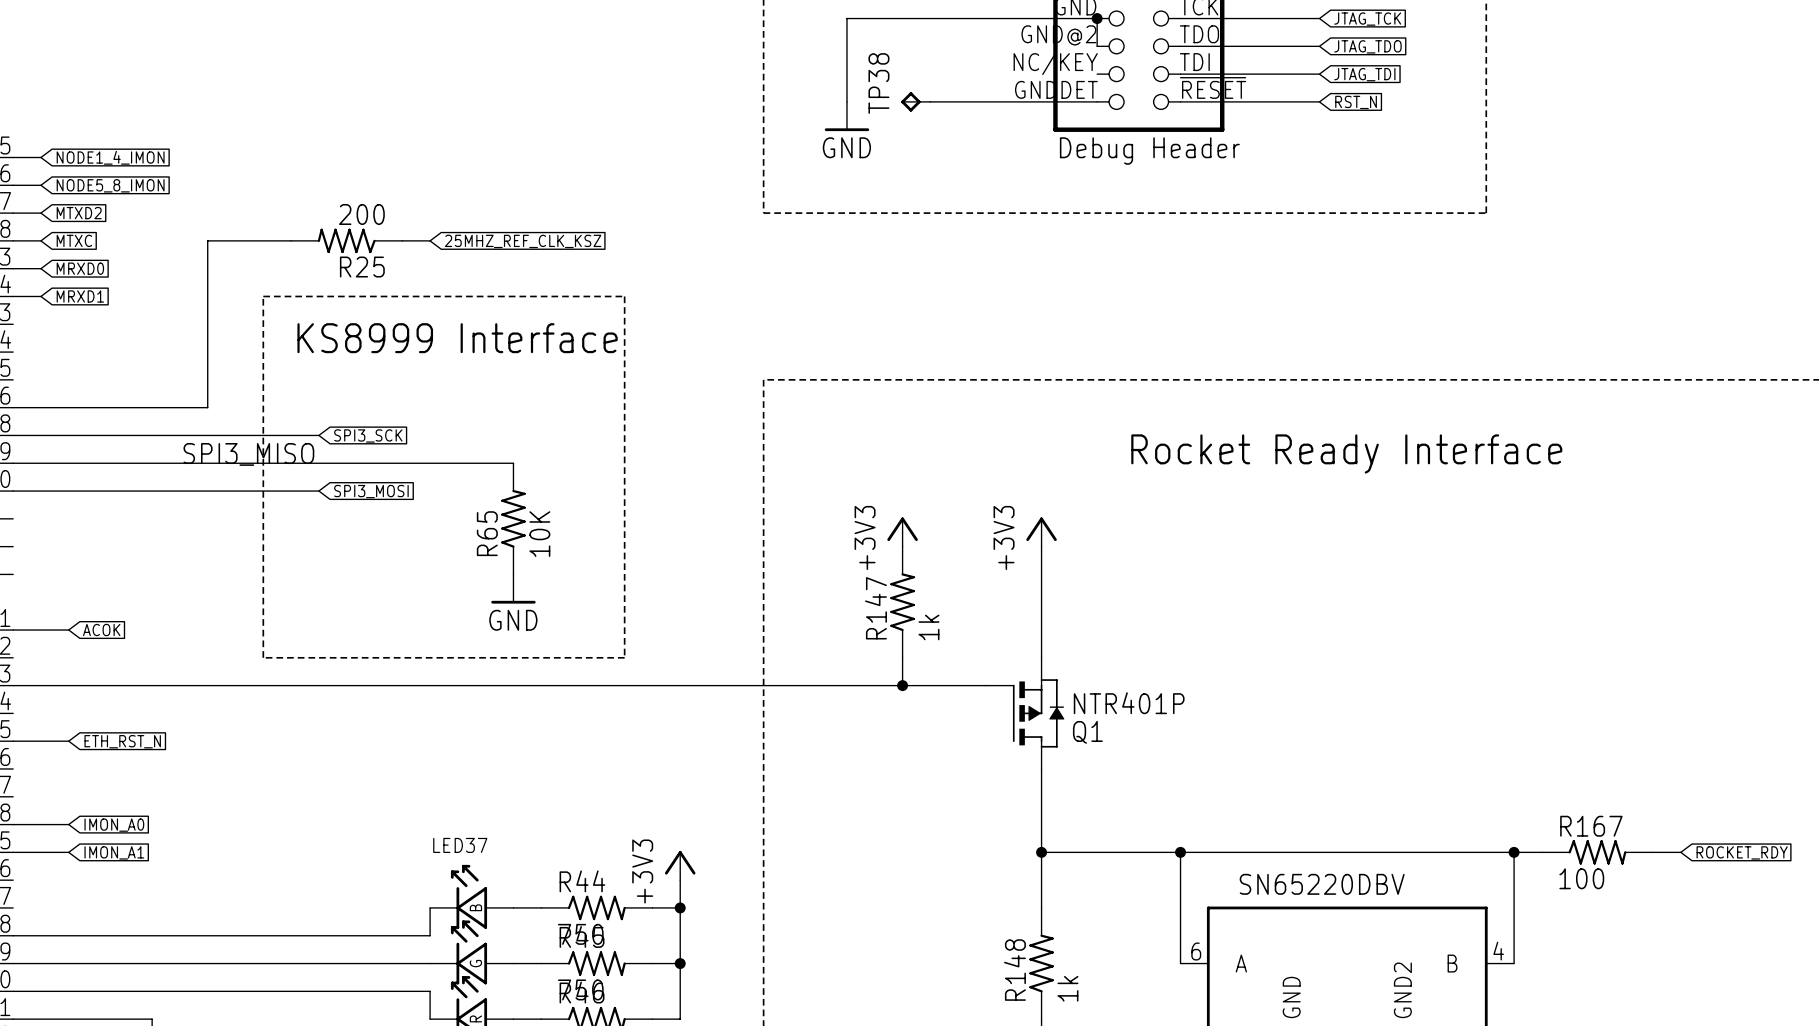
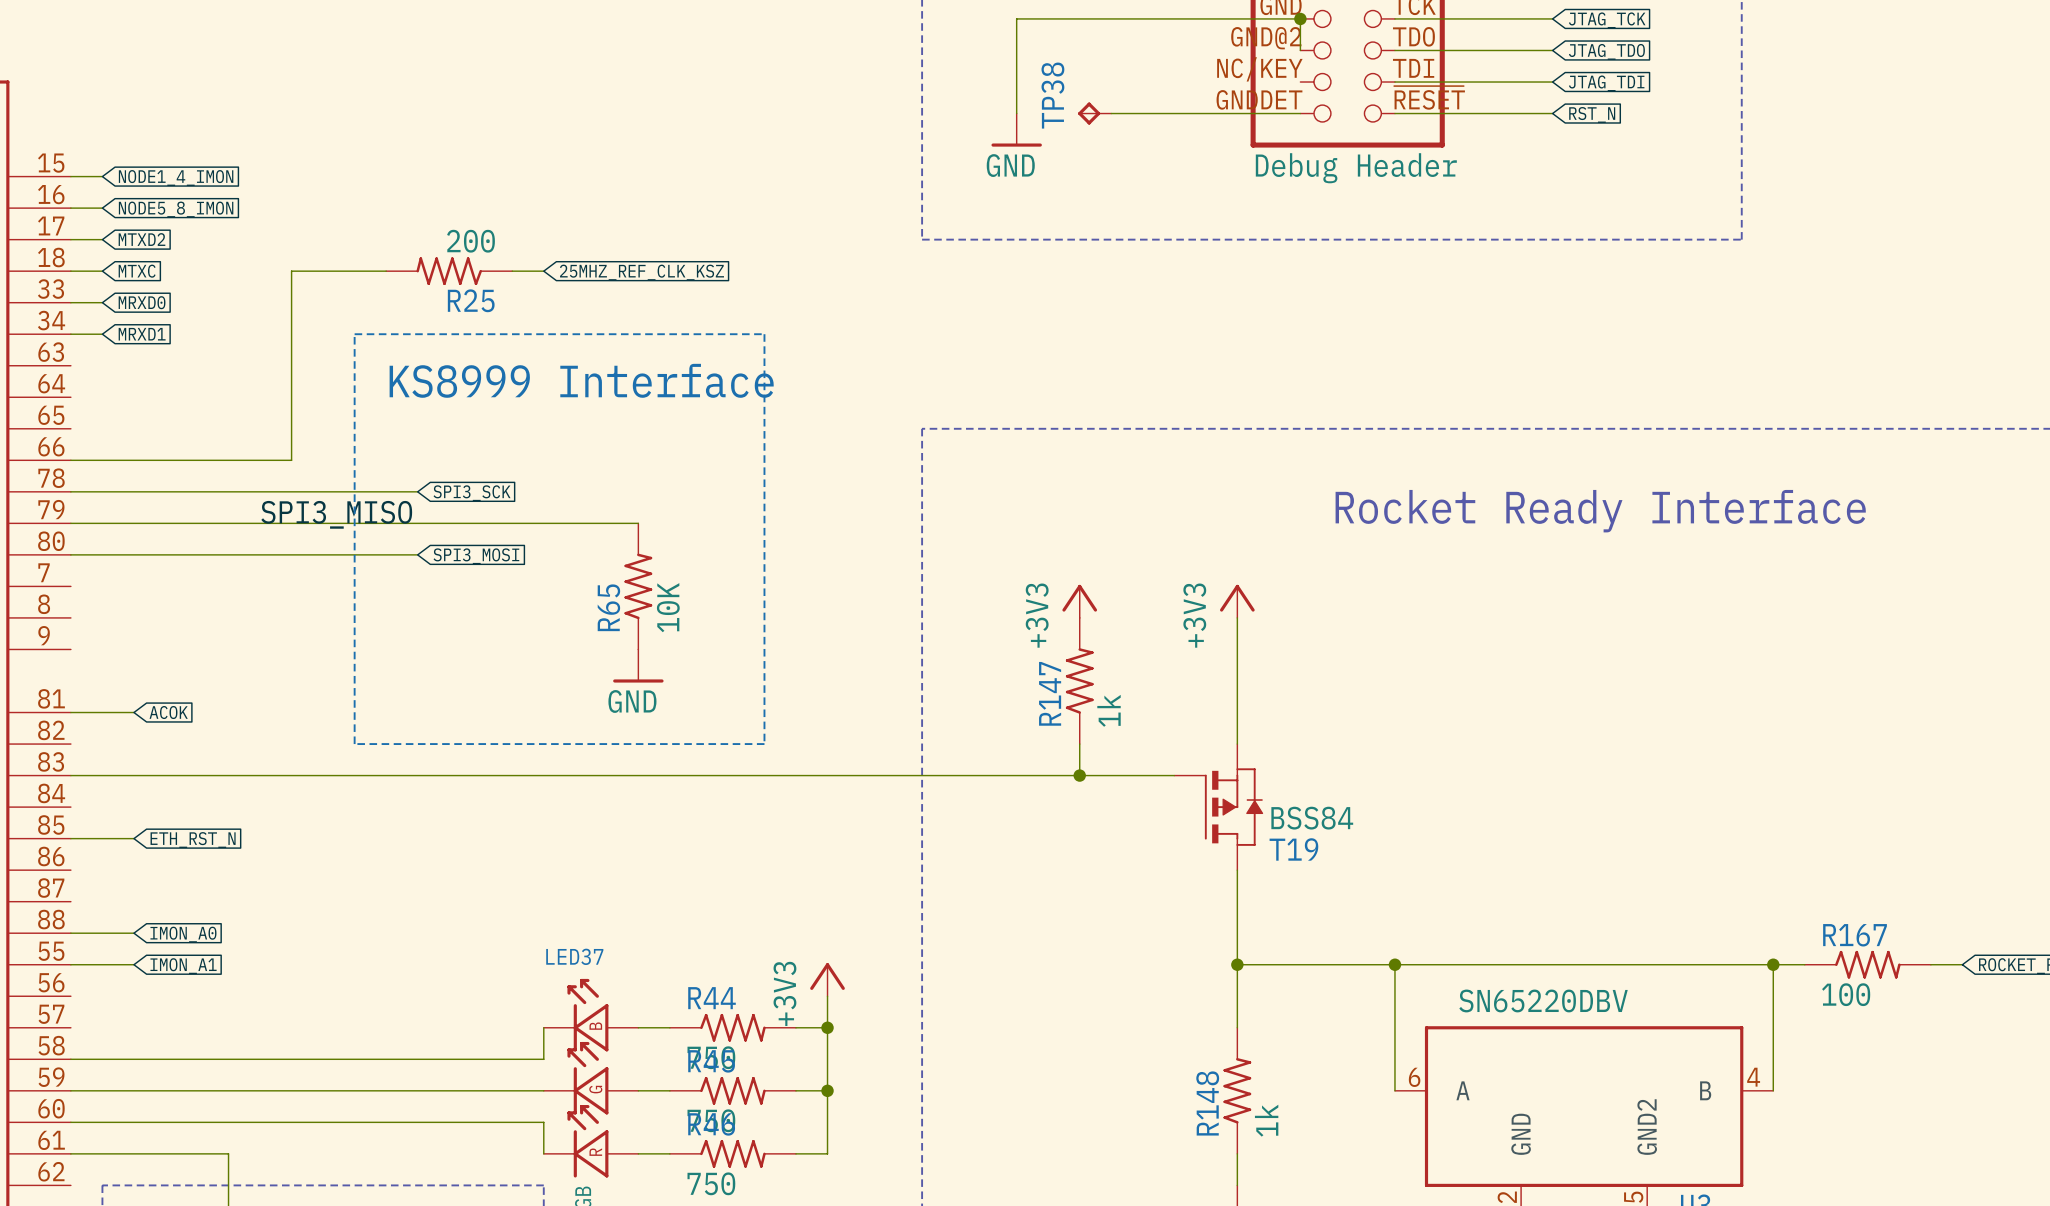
Q1 value: NTR401P (1129, 703) -> BSS84 (1312, 818)
Q1 name: Q1 (1087, 732) -> T19 (1293, 849)

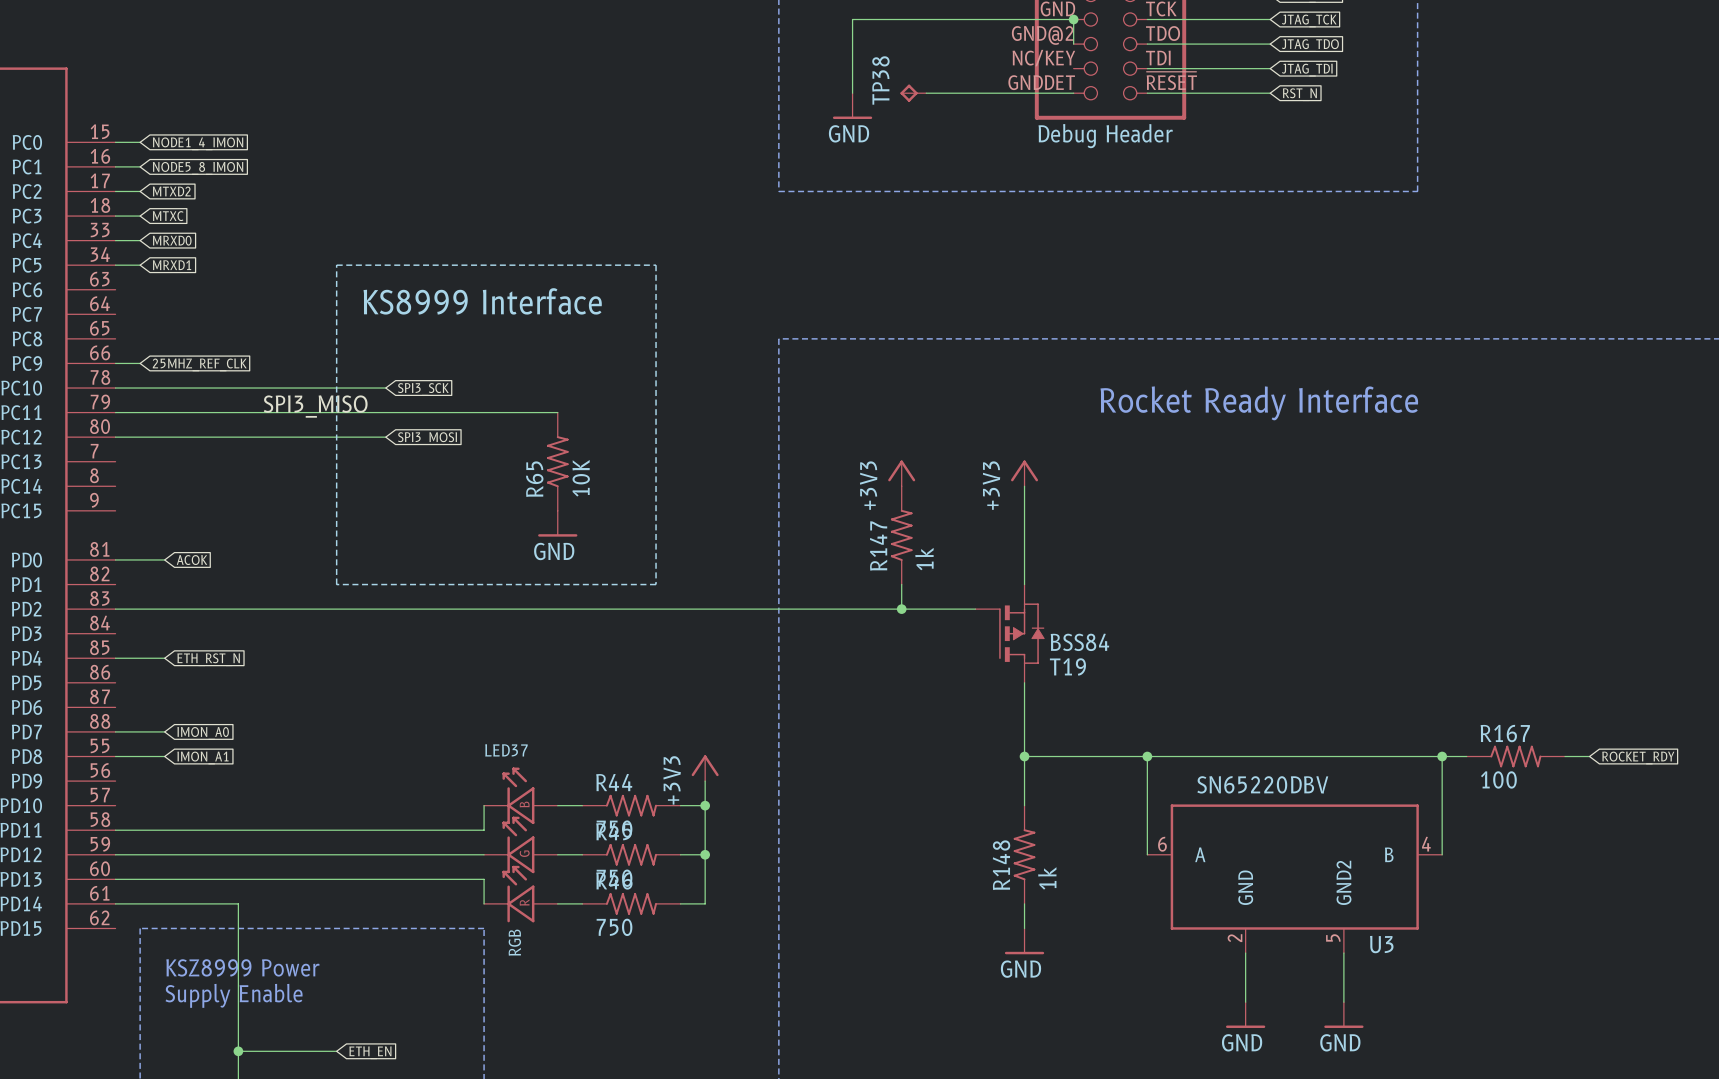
wire: (386, 271) (291, 271) (291, 460) (102, 460) -> none
R25: 200 (449, 271) -> none
wire: (512, 271) (543, 271) -> none
global label: 25MHZ_REF_CLK_KSZ (641, 272) -> none
global label: none -> 25MHZ_REF_CLK (199, 364)

